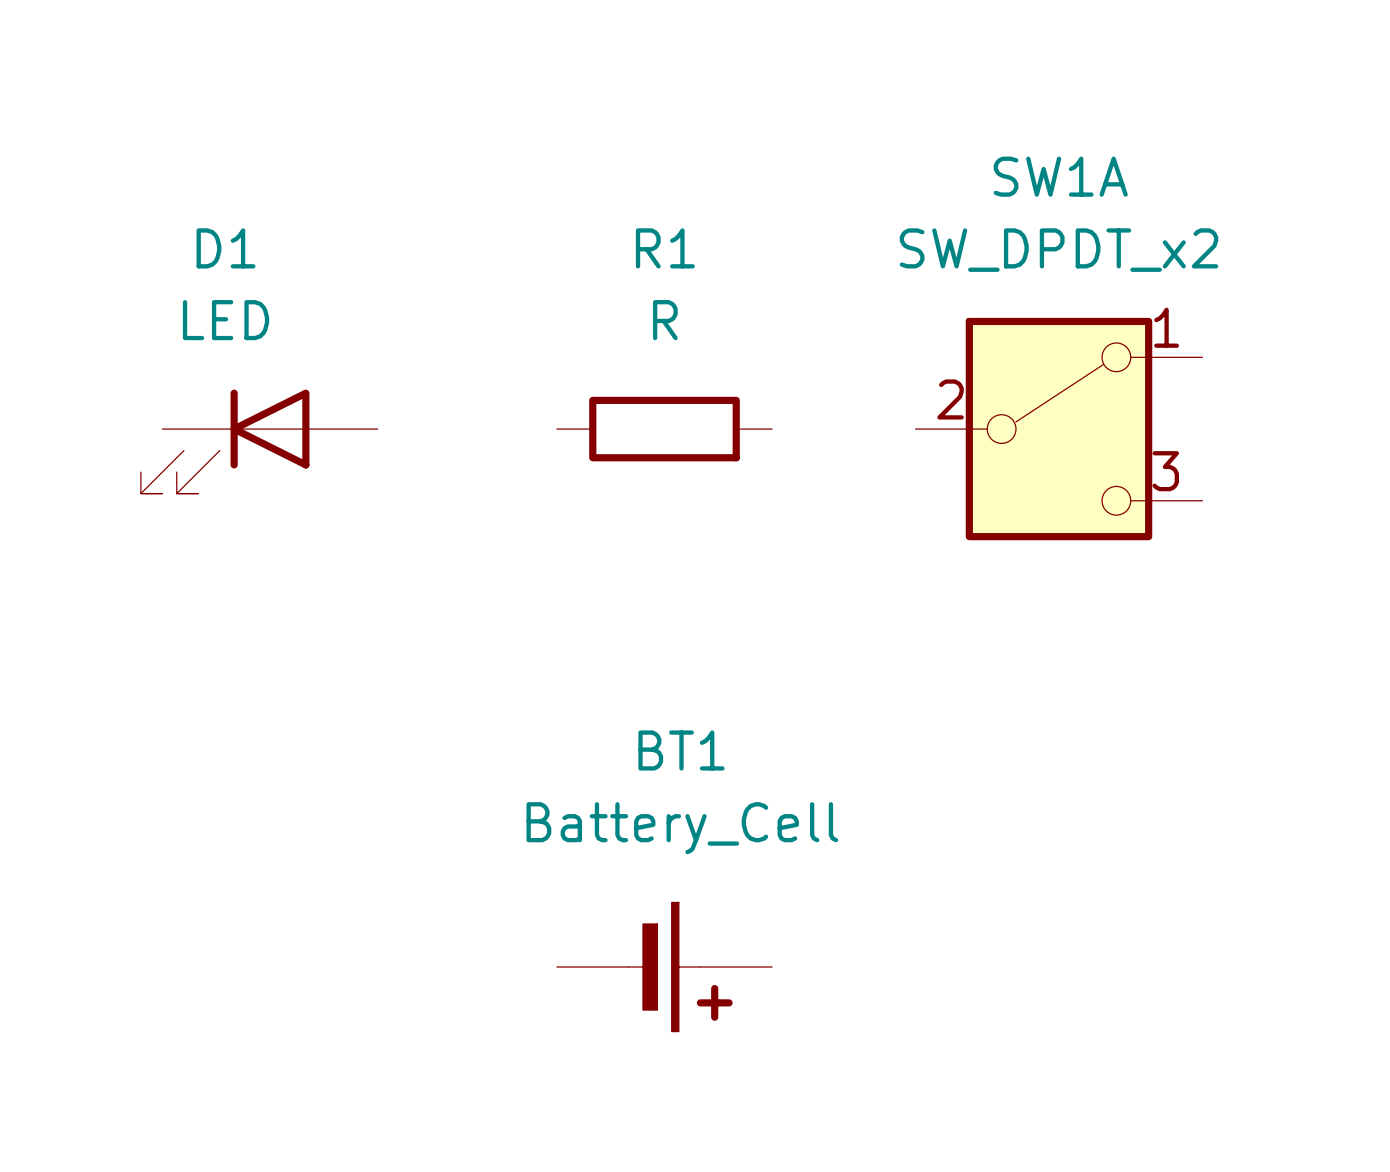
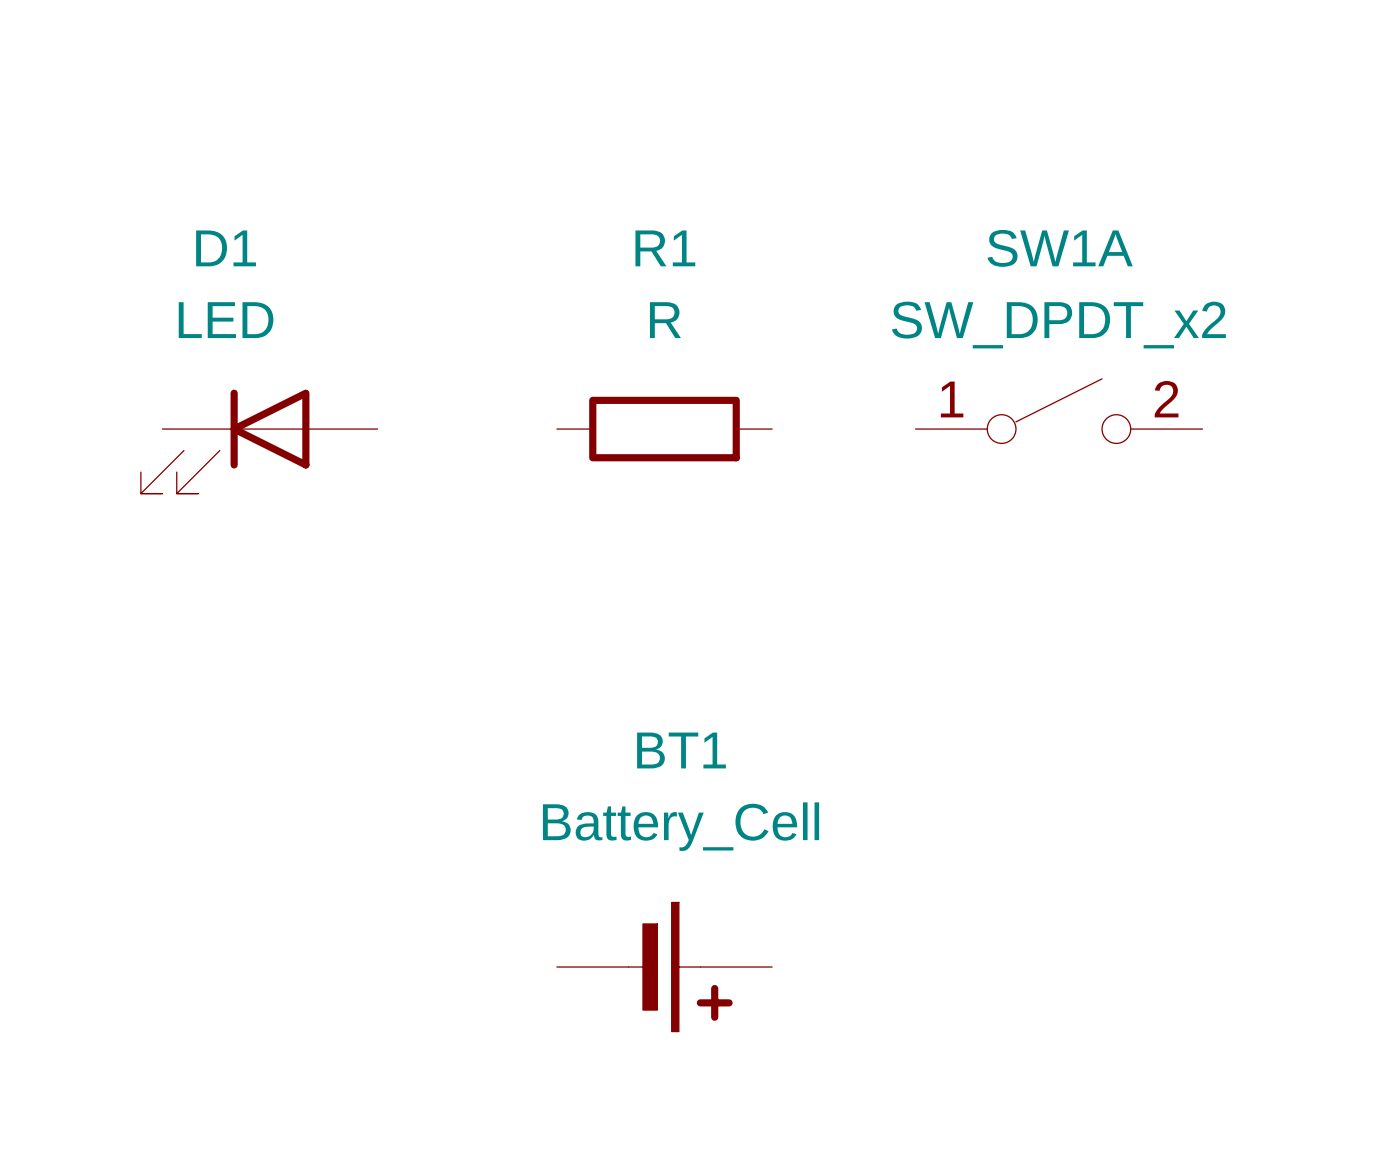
SW1A name position: SW1A (1060, 176) -> SW1A (1060, 248)
SW1A value position: SW_DPDT_x2 (1059, 250) -> SW_DPDT_x2 (1058, 325)
SW1A symbol: [915, 317, 1203, 541] -> [915, 378, 1203, 444]

